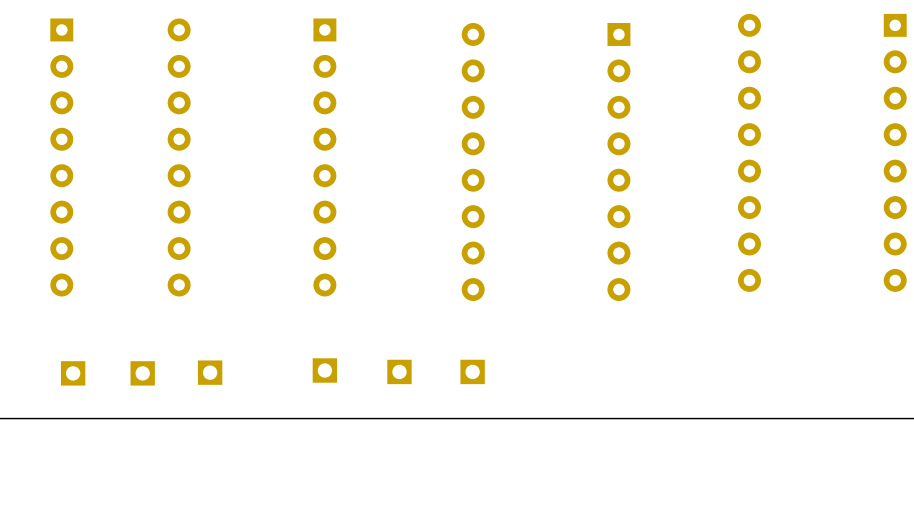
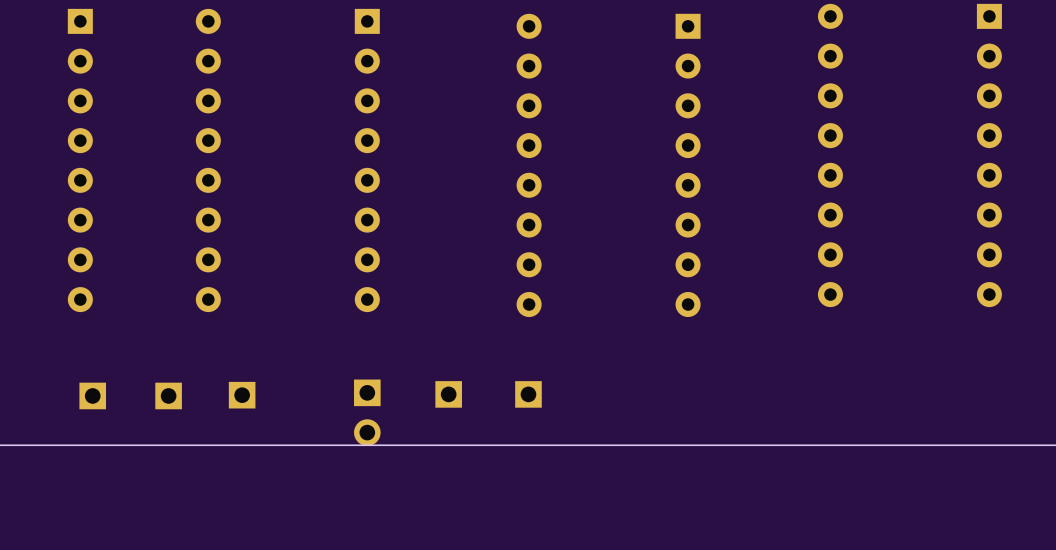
part: none -> (367, 412)

